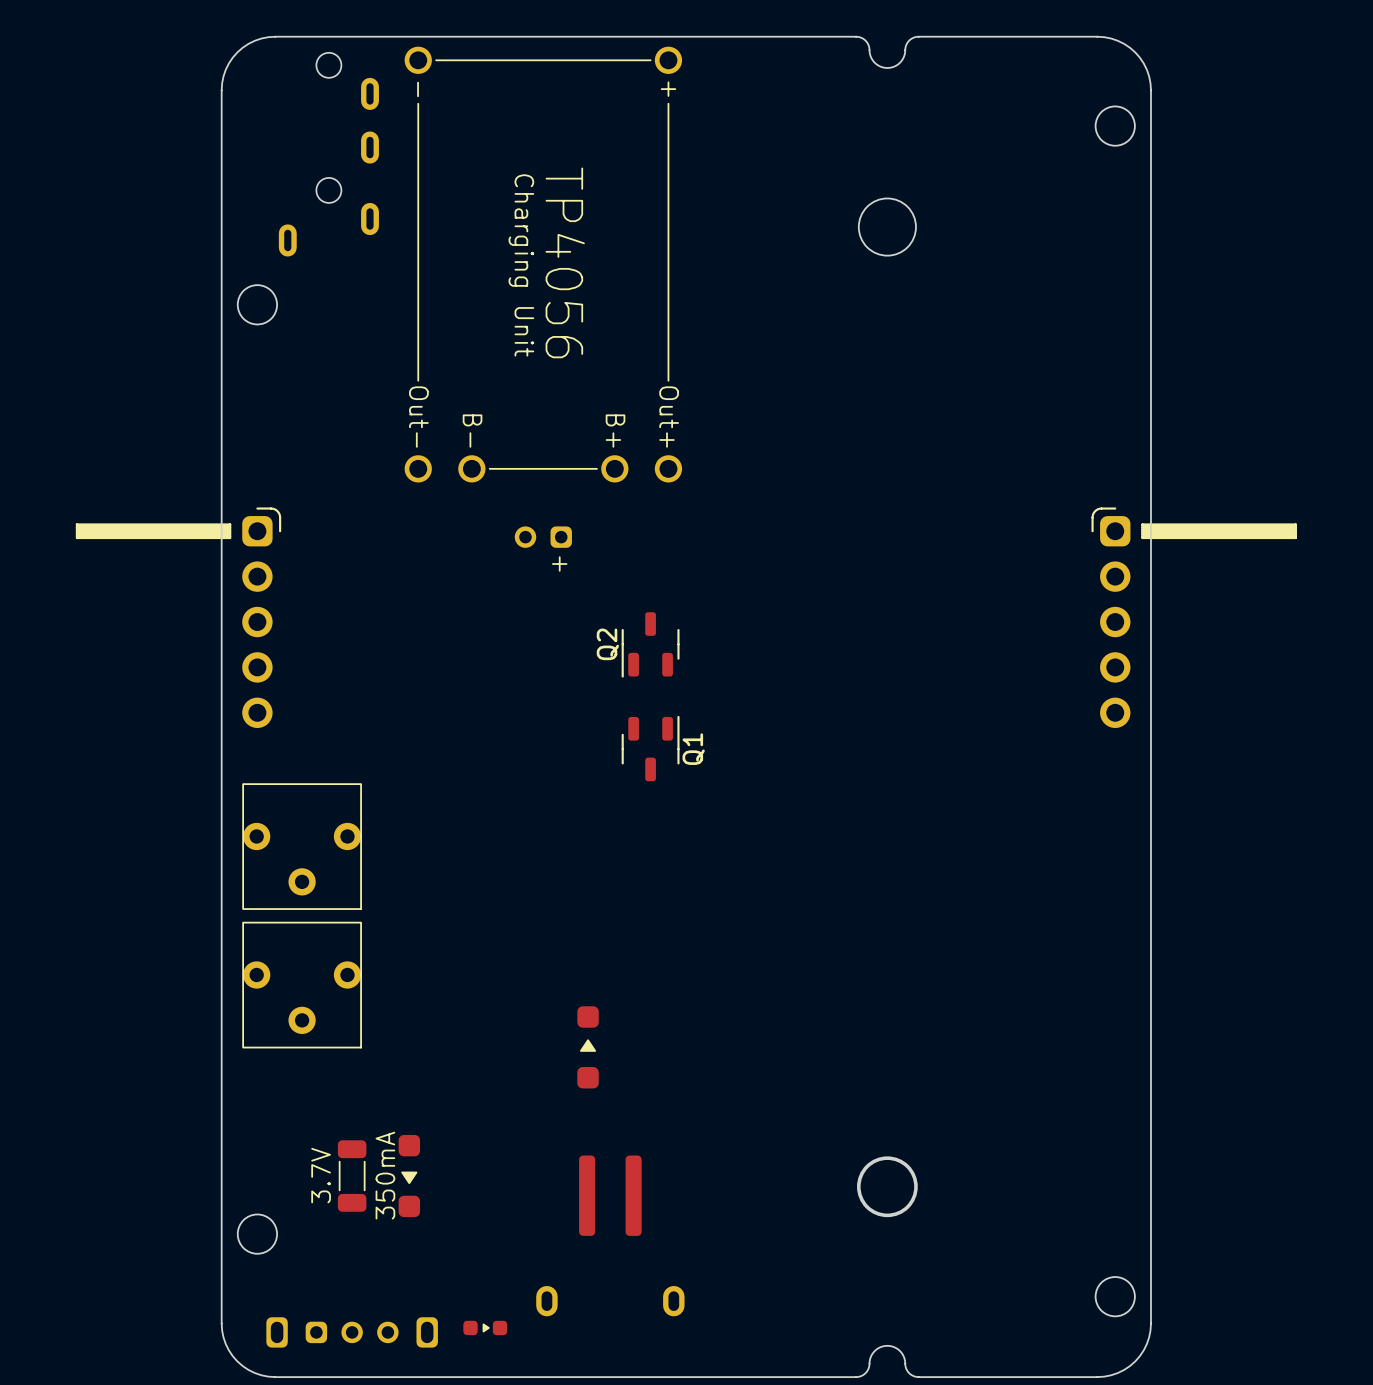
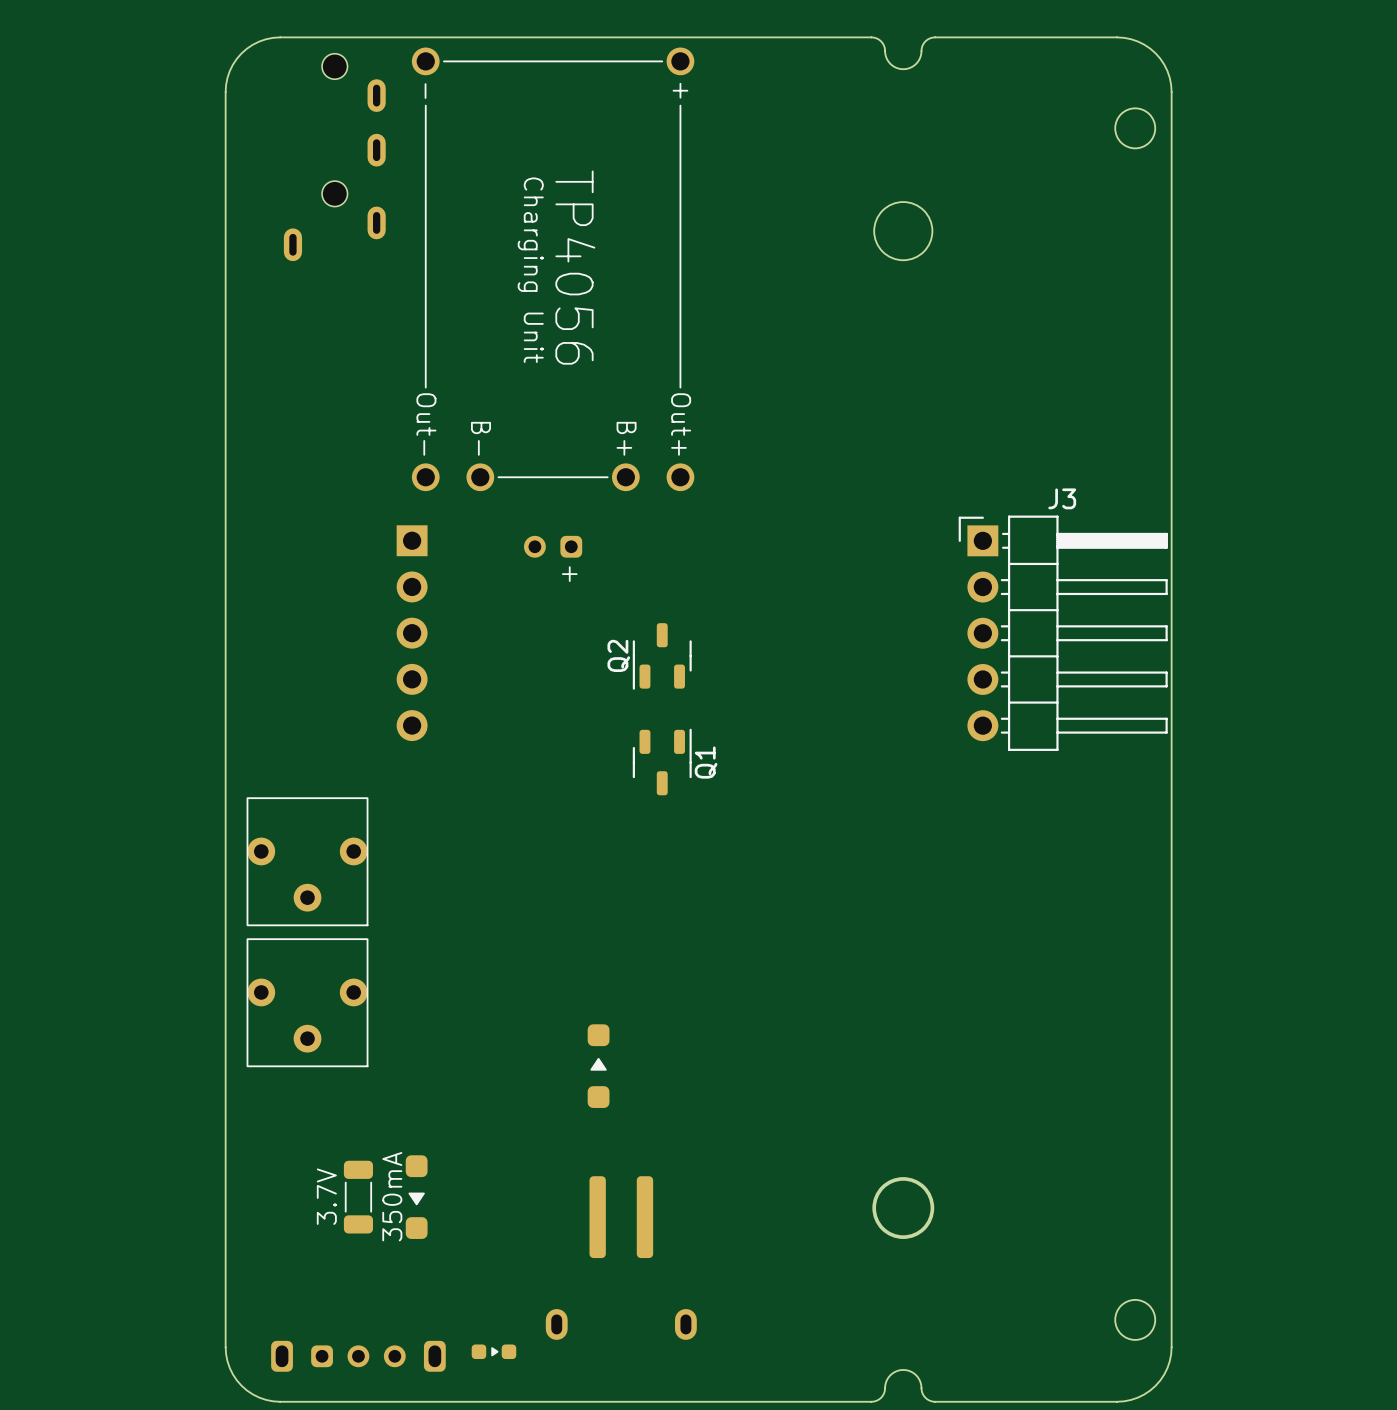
round board edge: [236, 284, 278, 326] -> none
part: (178, 617) -> none
part: (1194, 617) -> none
part: none -> (412, 633)
J3: none -> (1063, 633)
round board edge: [236, 1213, 278, 1255] -> none

